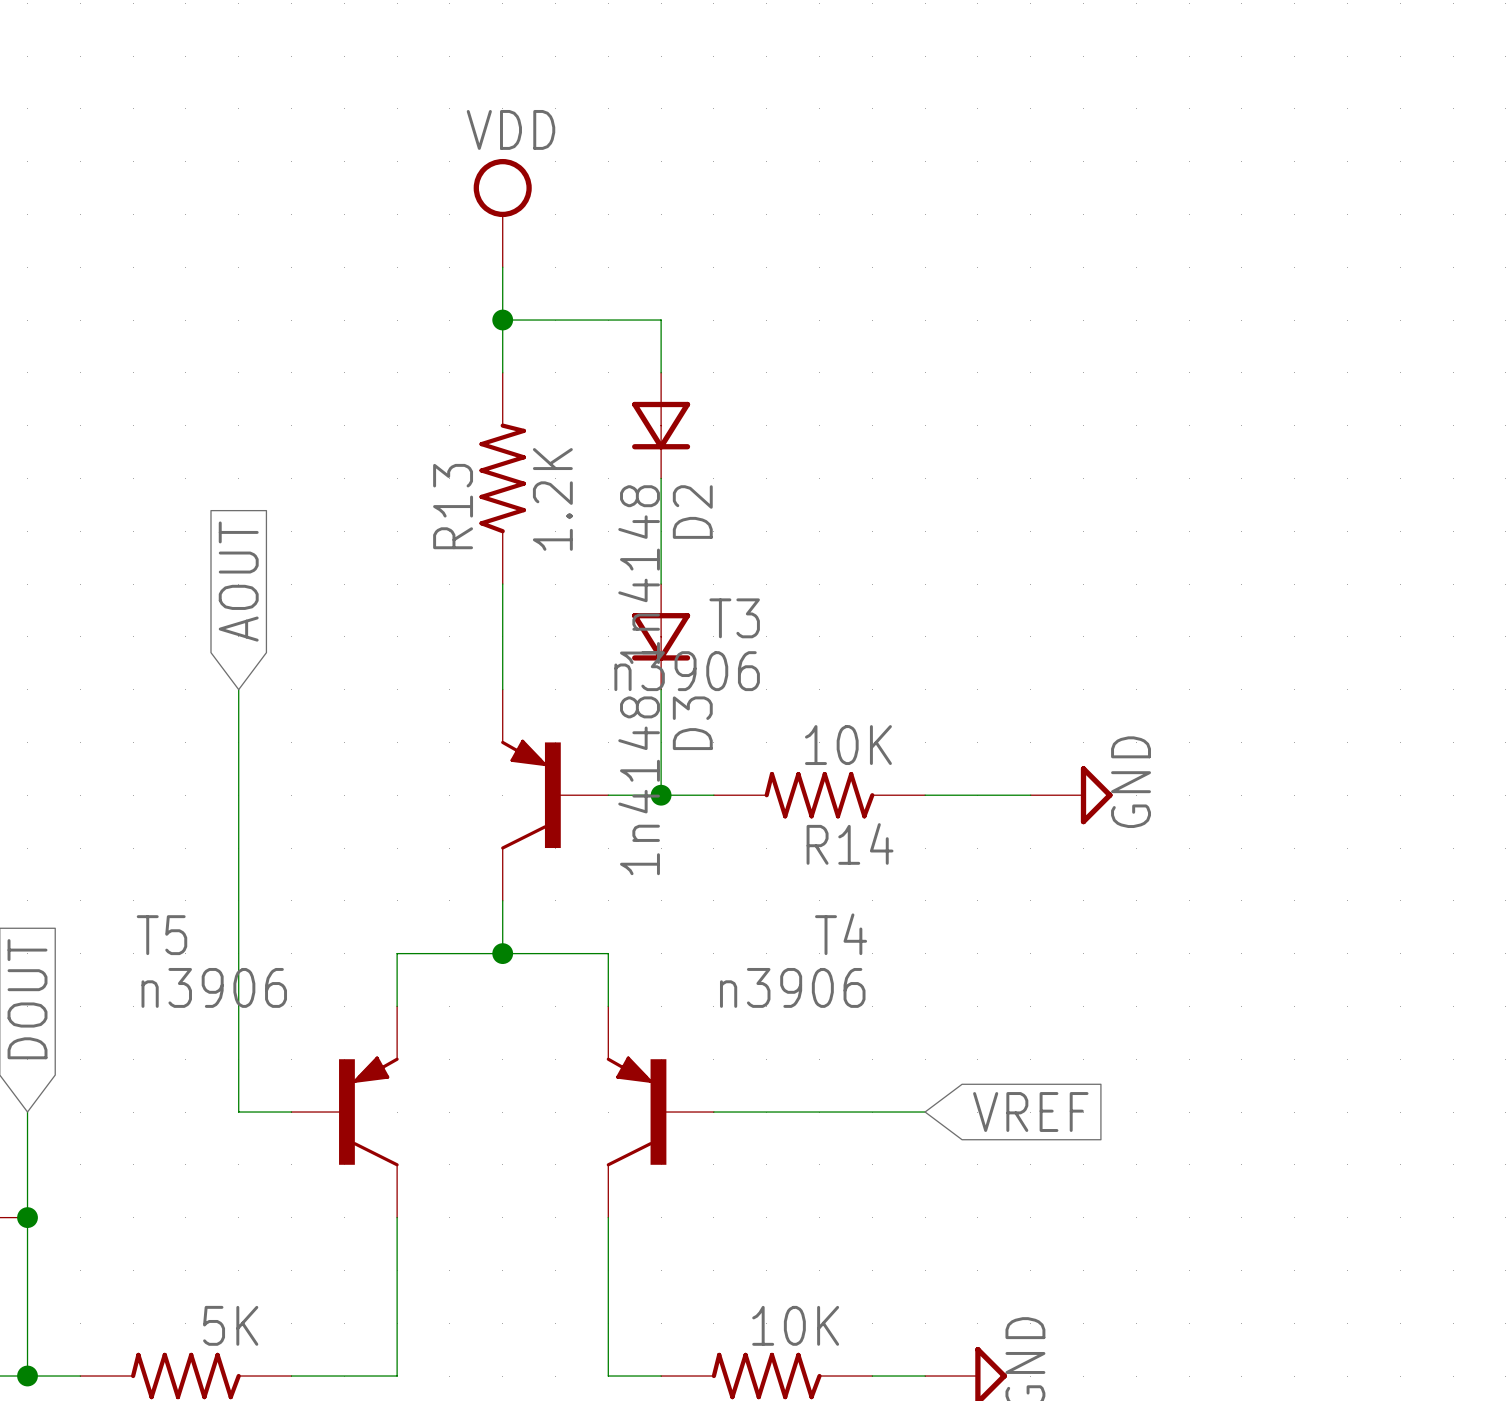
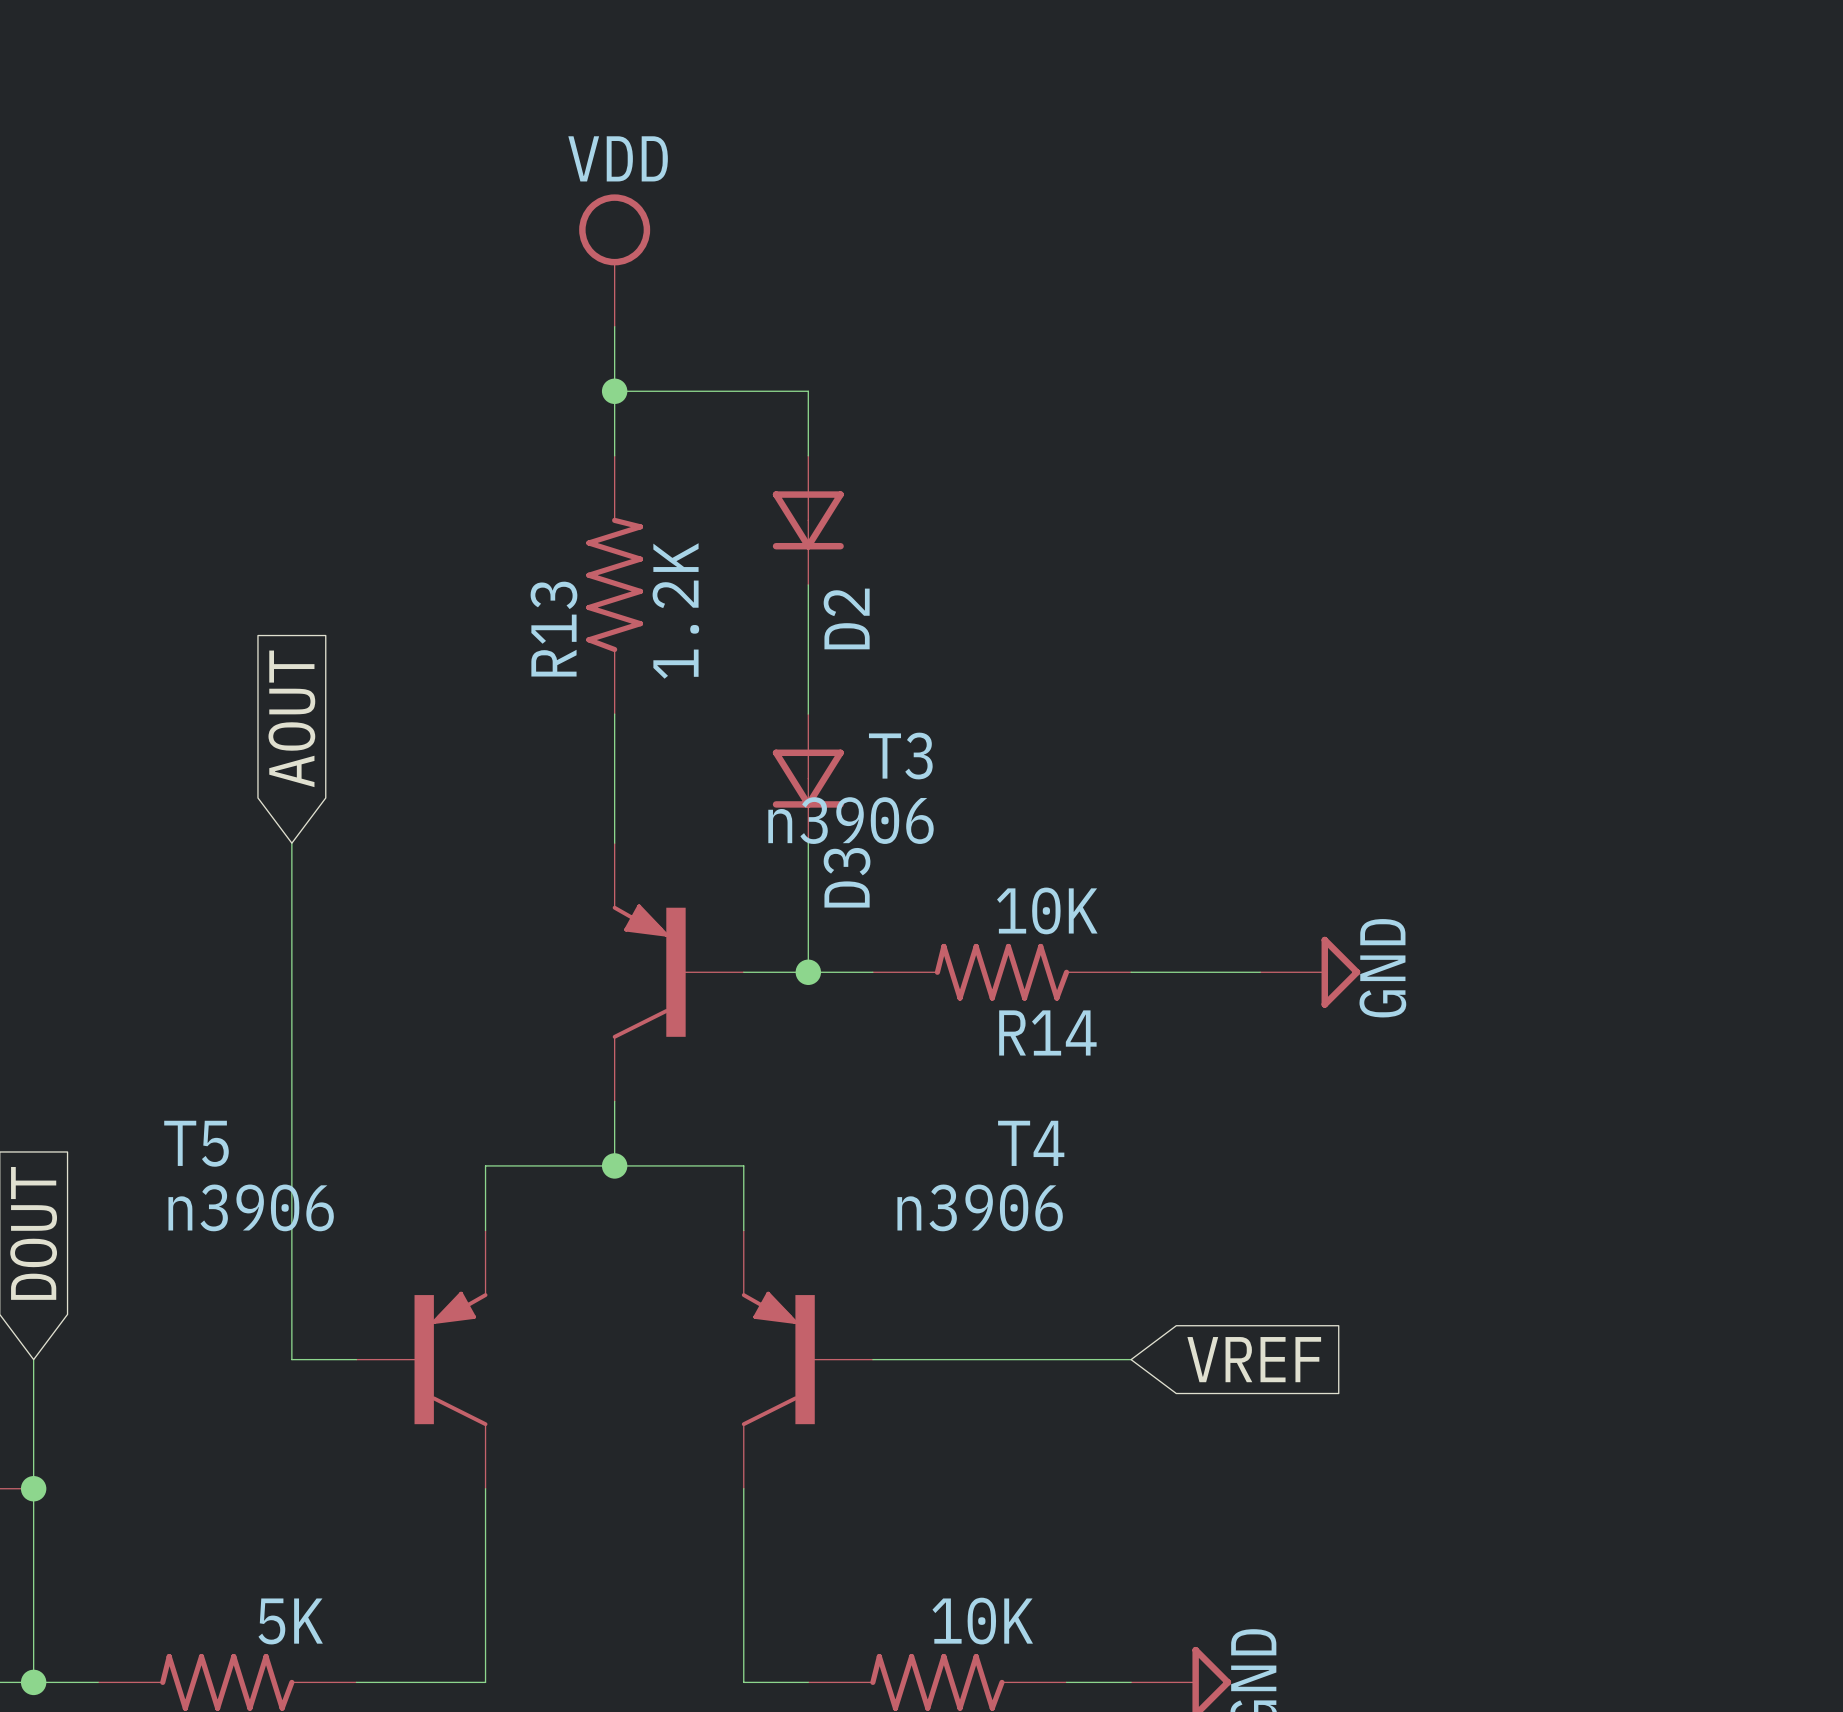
D2 value: 1n4148 (639, 574) -> none
D3 value: 1n4148 (639, 785) -> none

